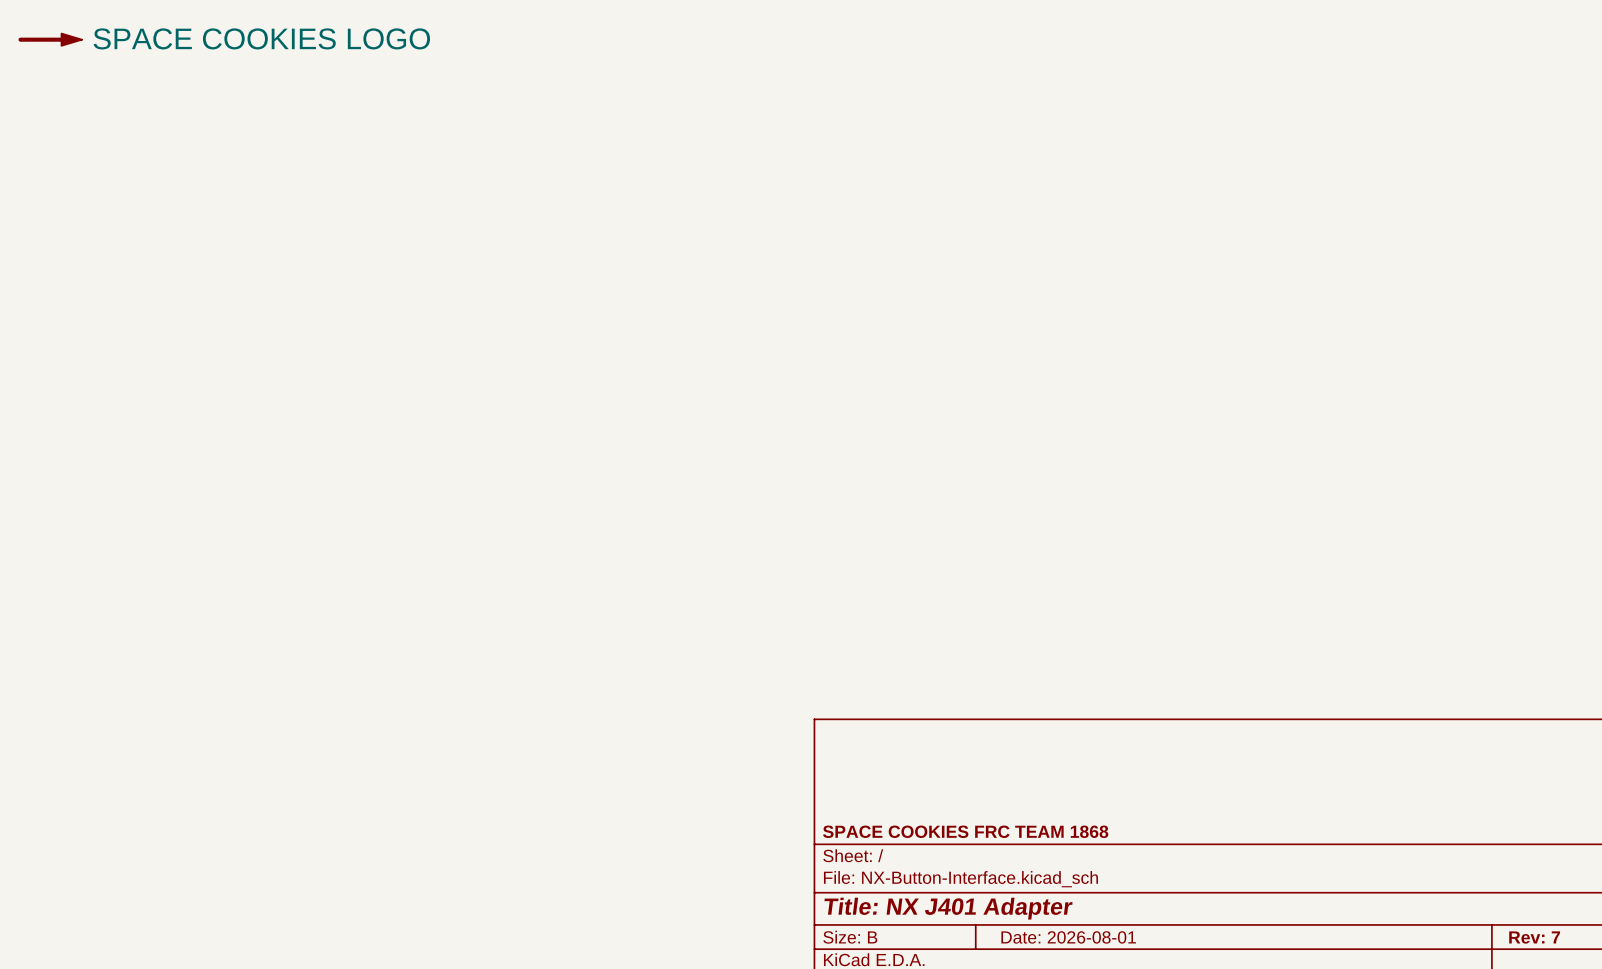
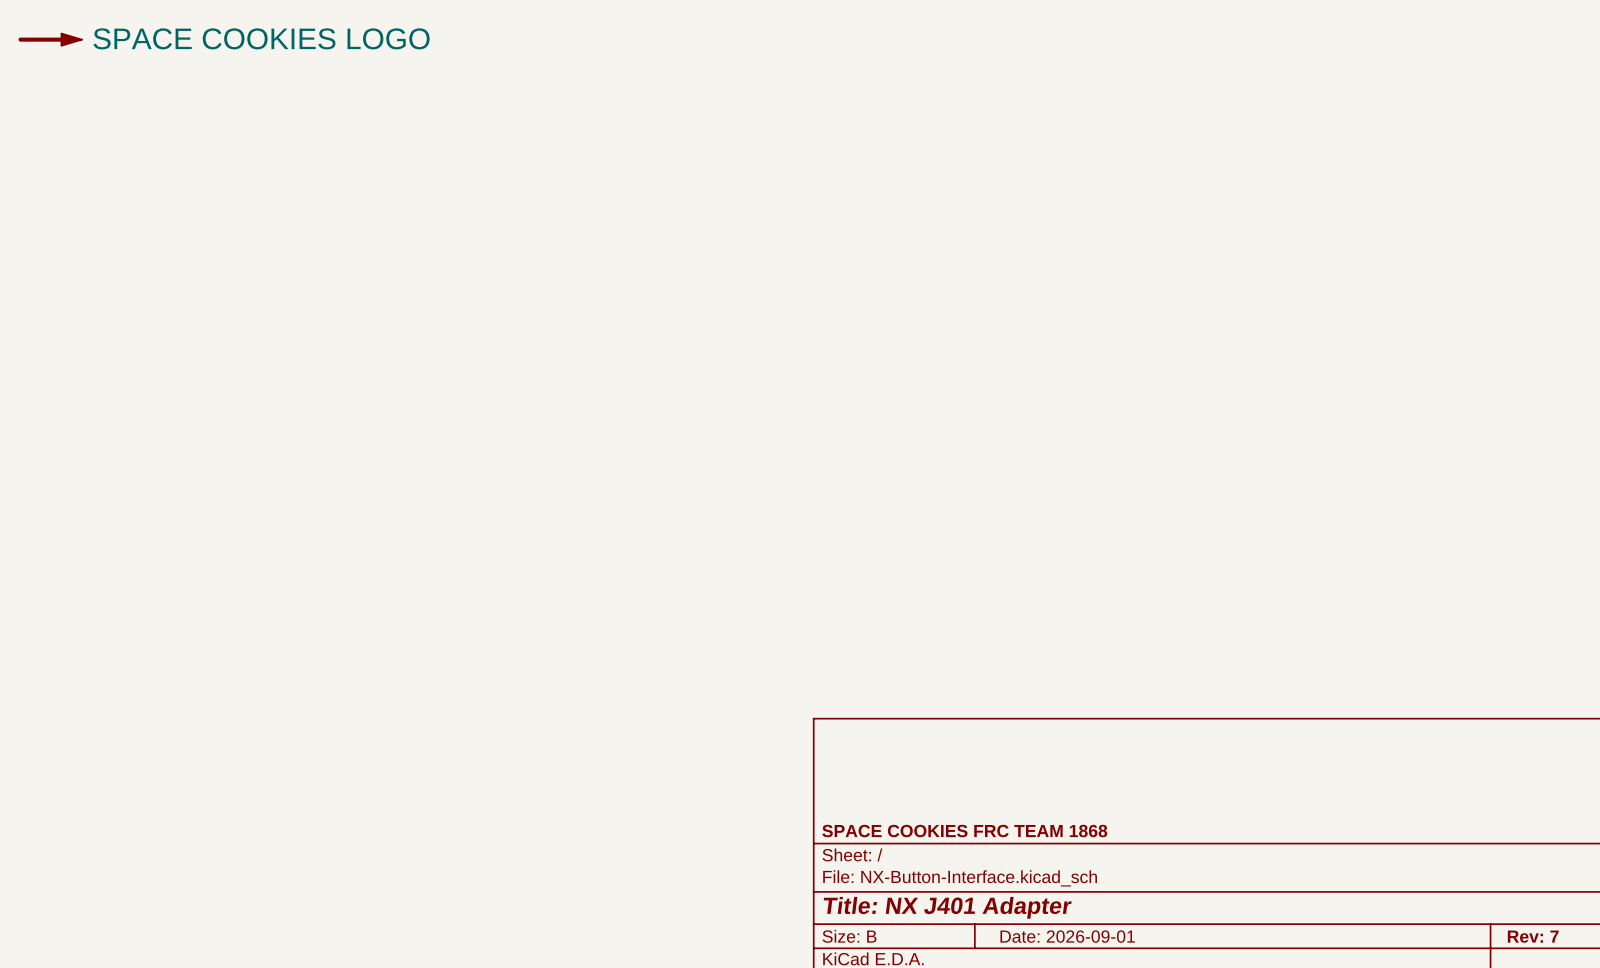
title block: Date: 2026-08-01 (1068, 937) -> Date: 2026-09-01 (1067, 936)

